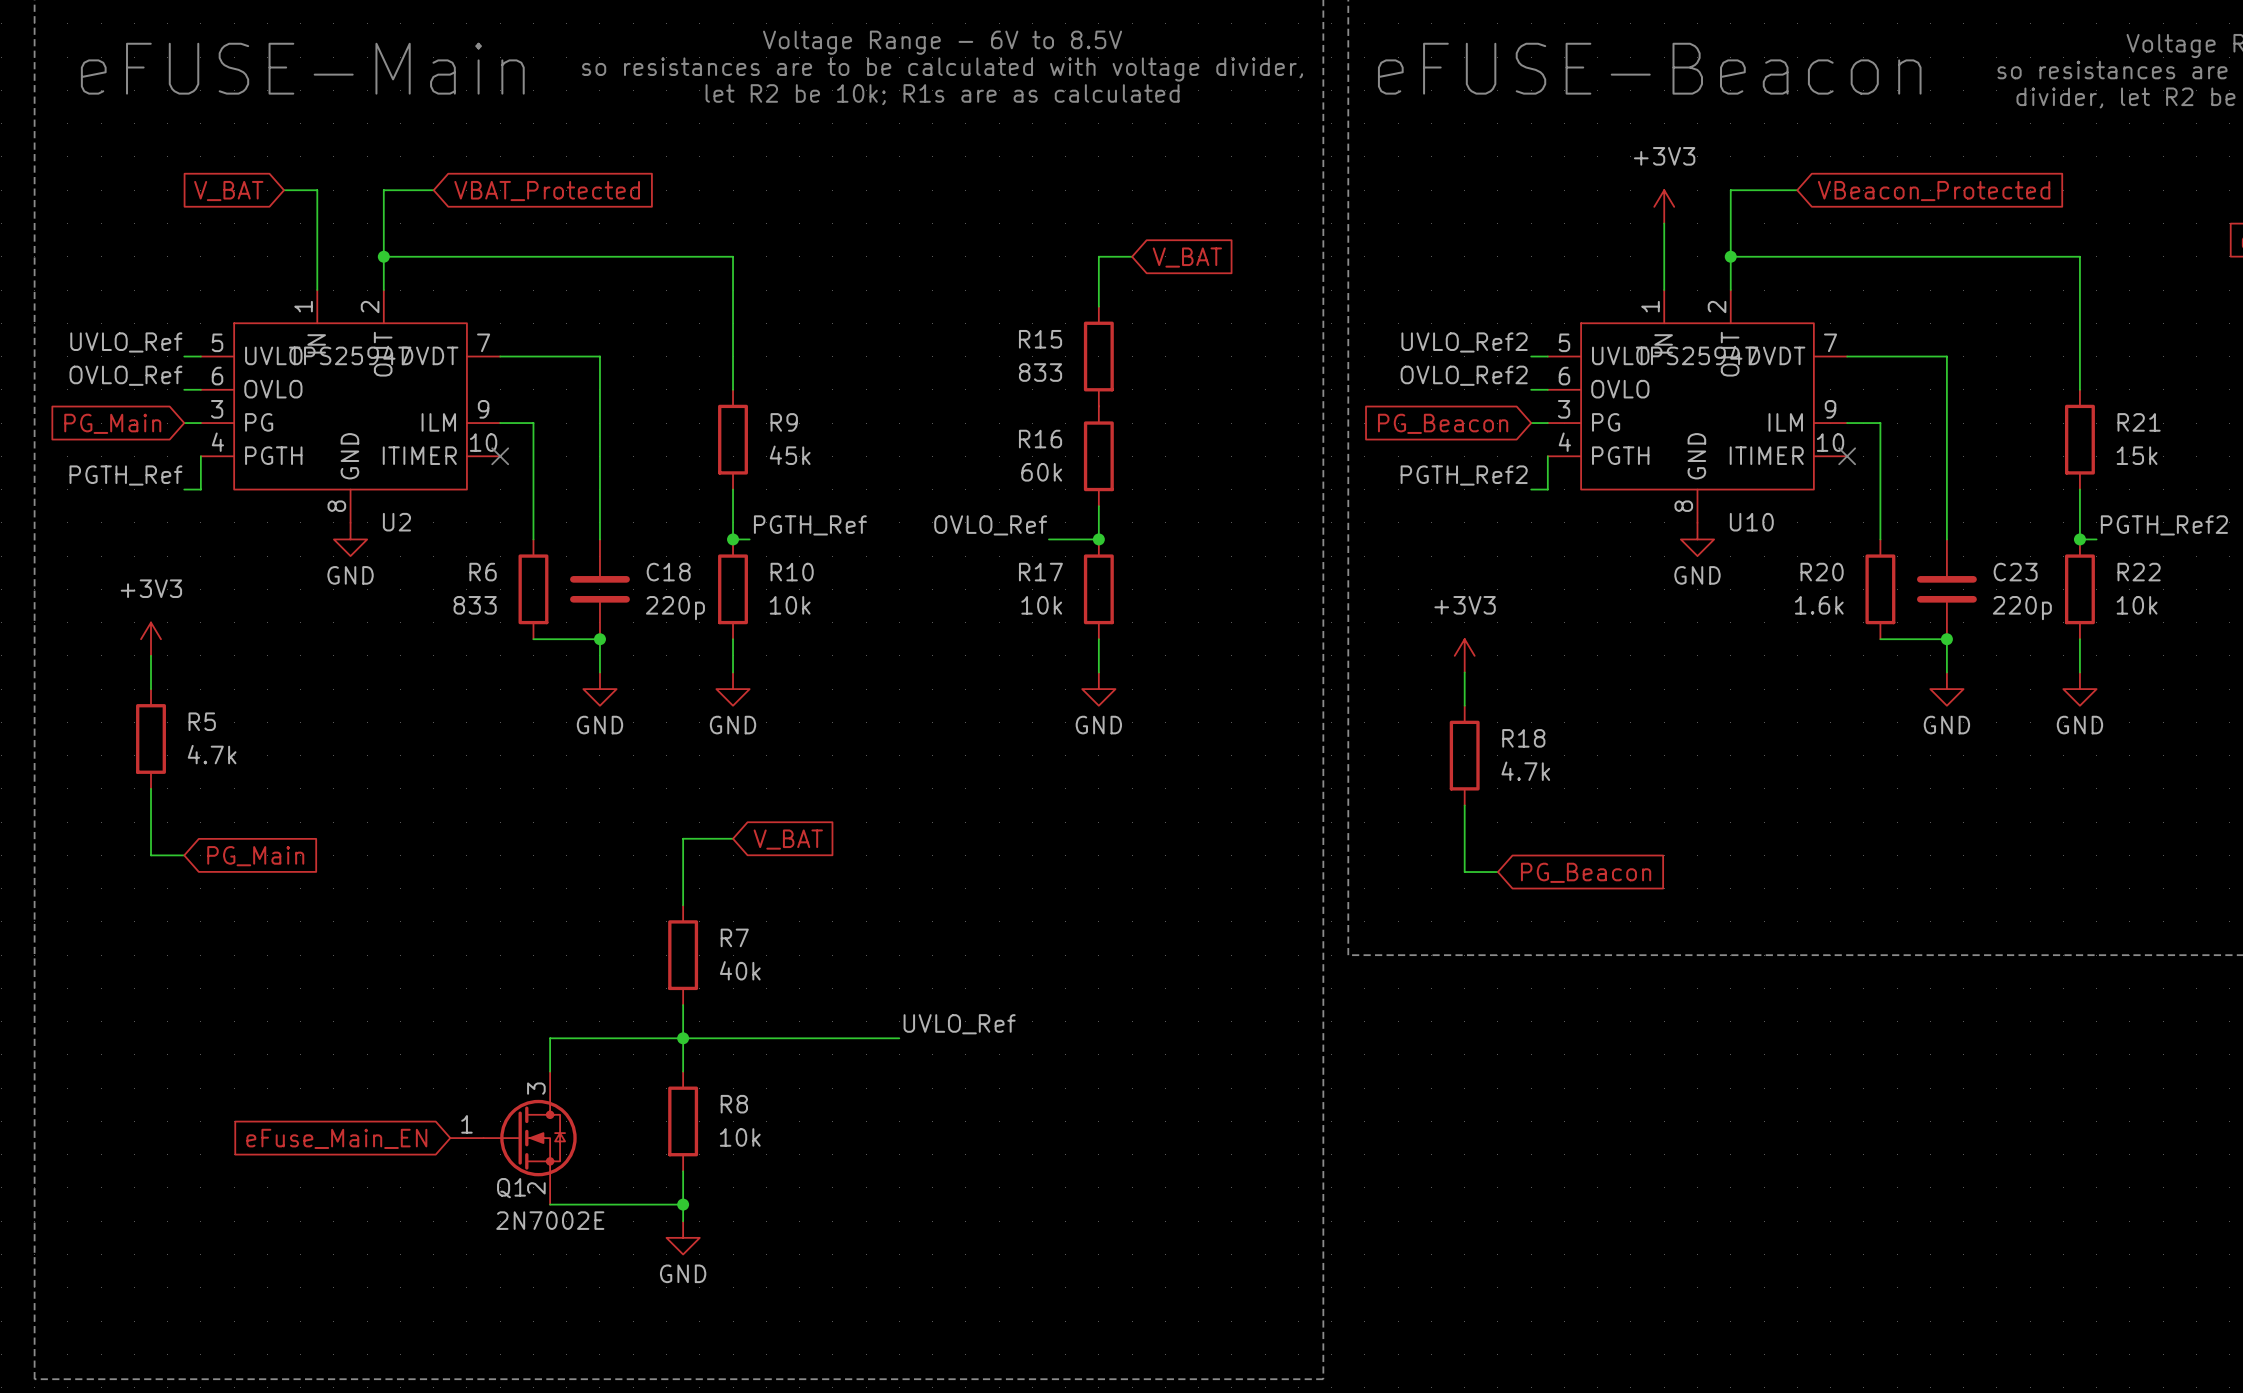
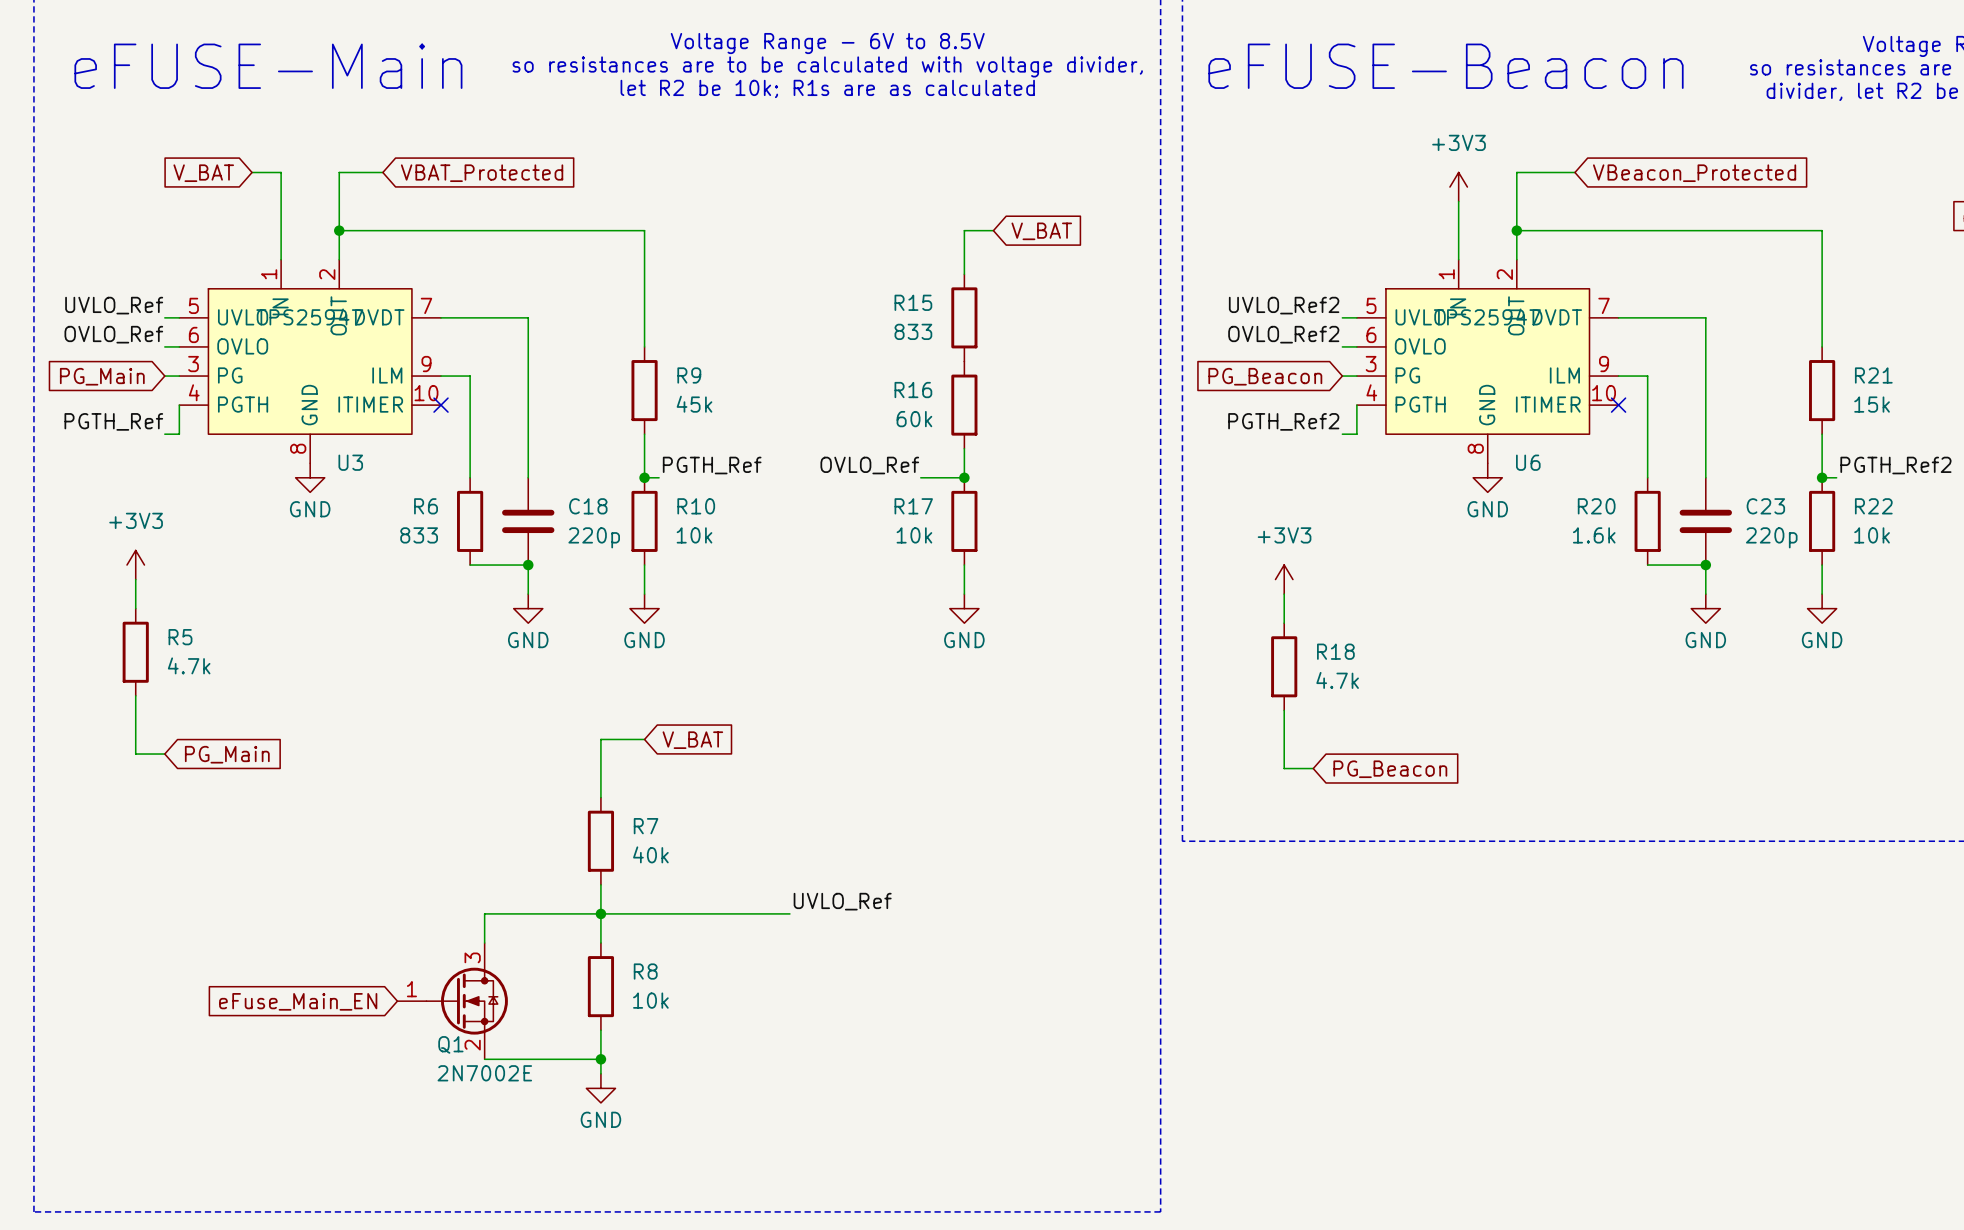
U2 name: U2 (396, 522) -> U3 (350, 462)
U10 name: U10 (1751, 522) -> U6 (1528, 462)

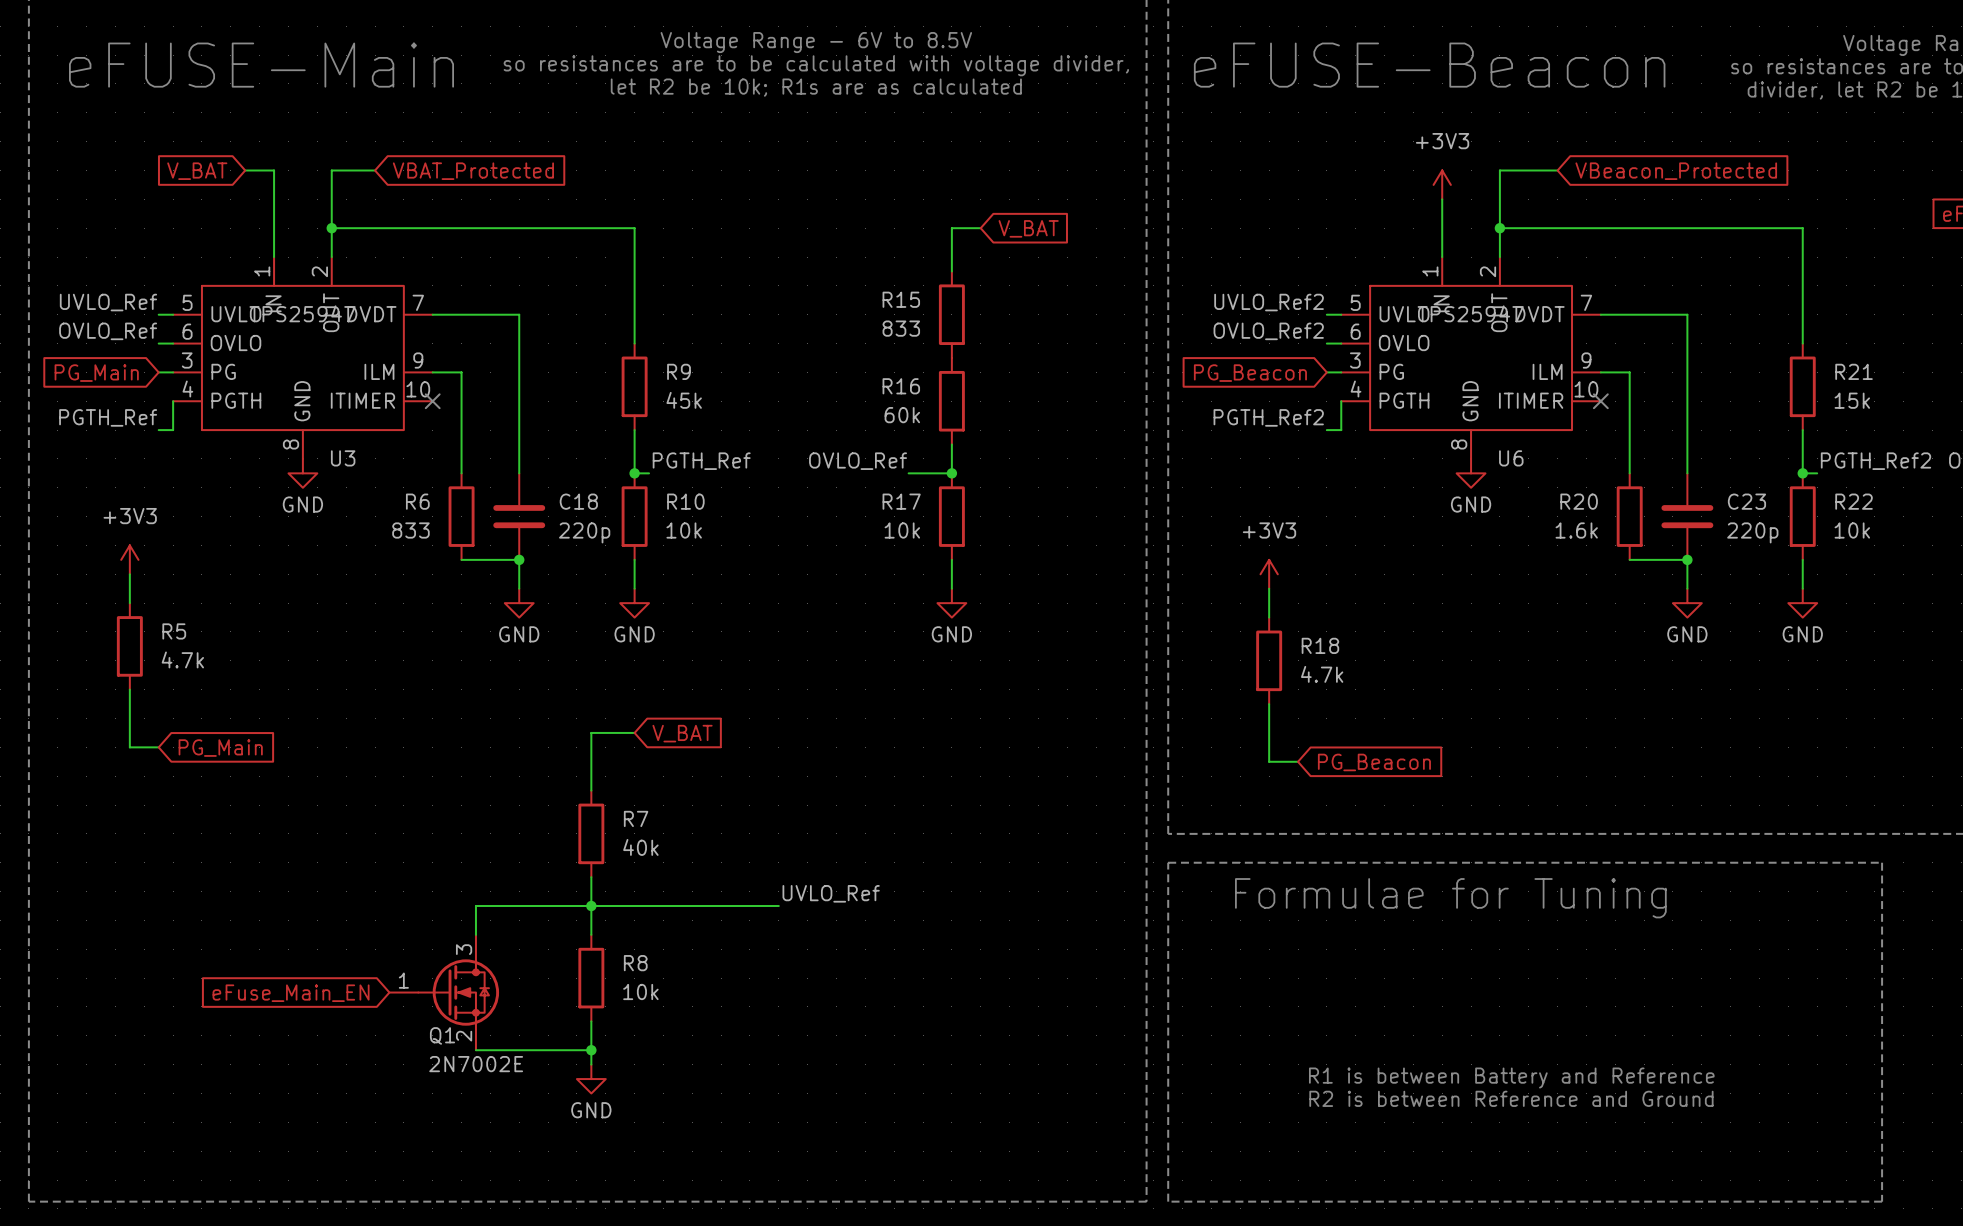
line: none -> (1168, 862) (1882, 862) (1882, 1201) (1168, 1201) (1168, 862)
text: none -> Formulae for Tuning (1450, 898)
text: none -> R1 is between Battery and Reference (1511, 1078)
text: none -> R2 is between Reference and Ground (1511, 1098)

